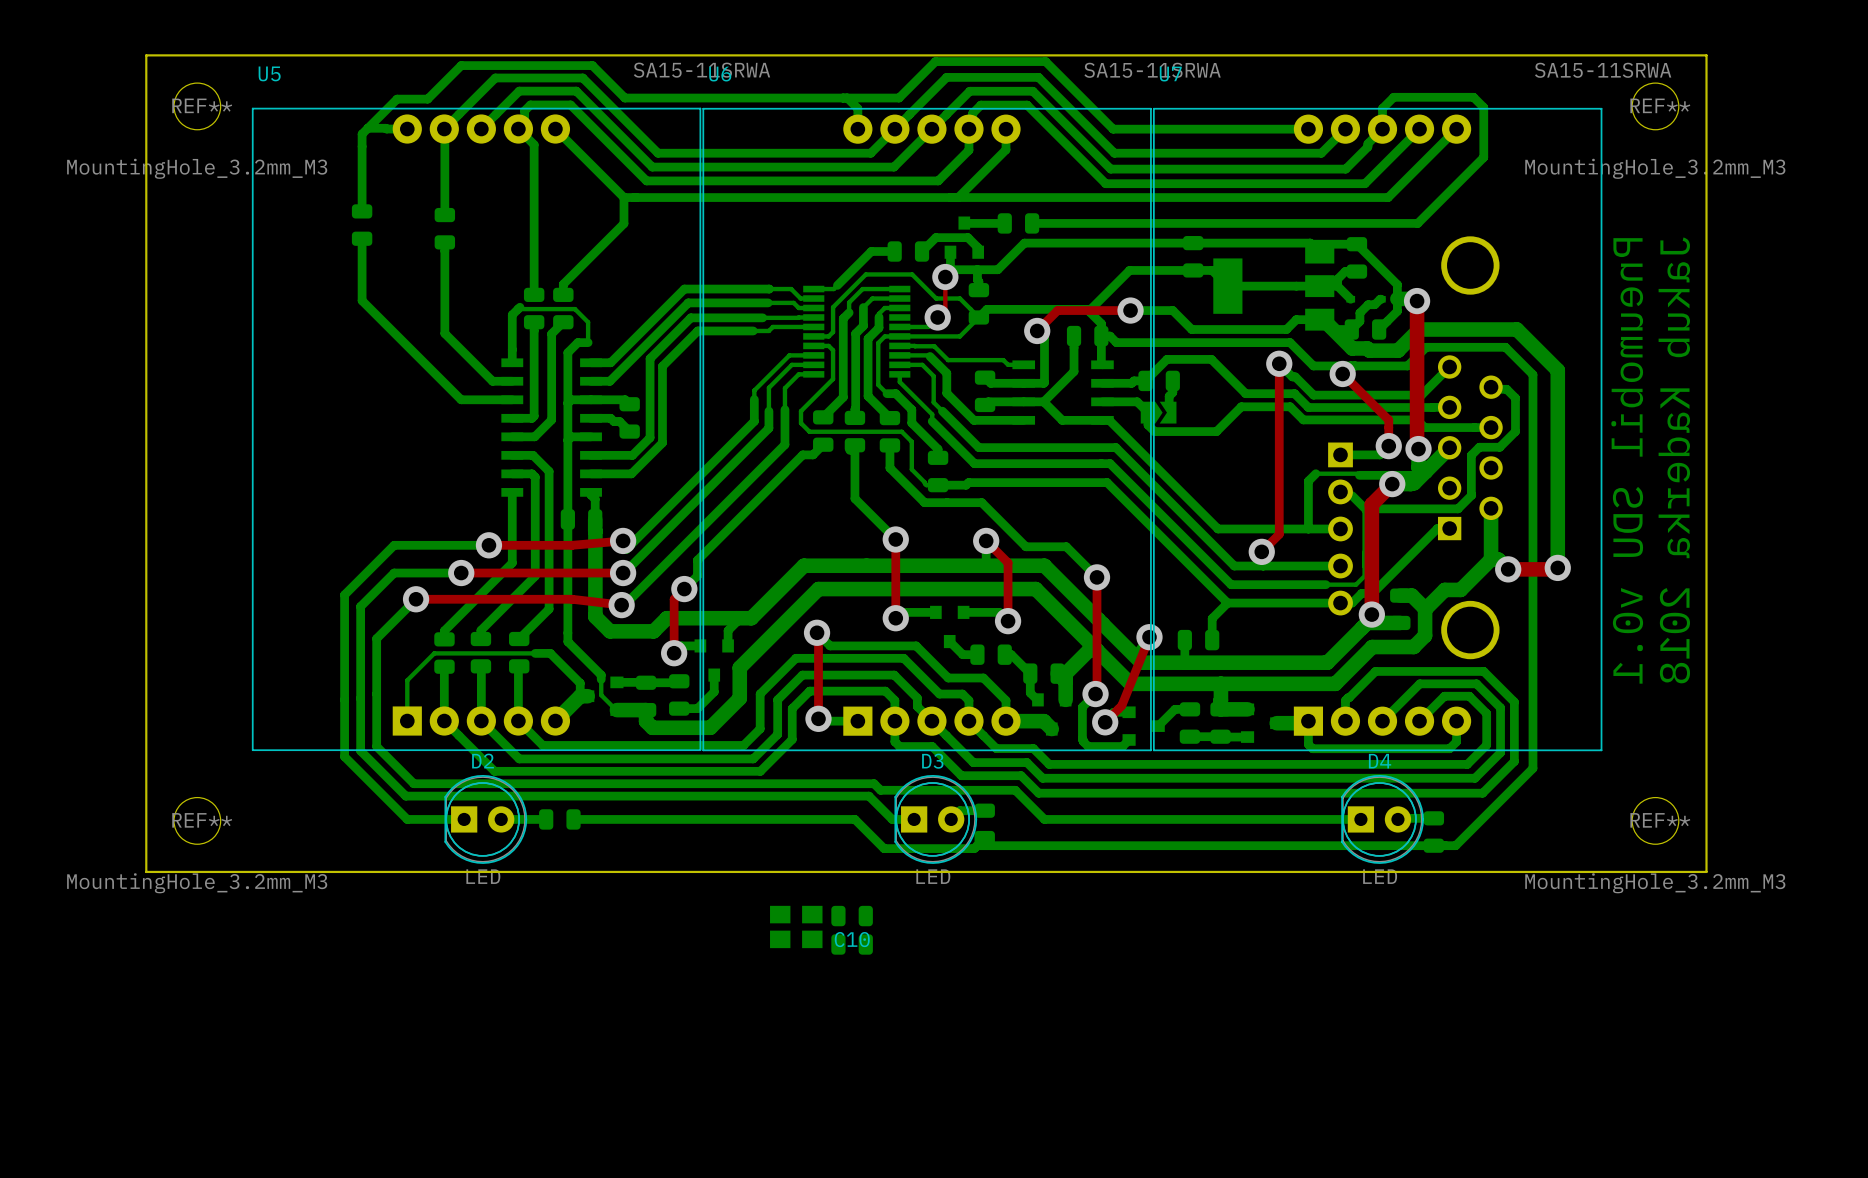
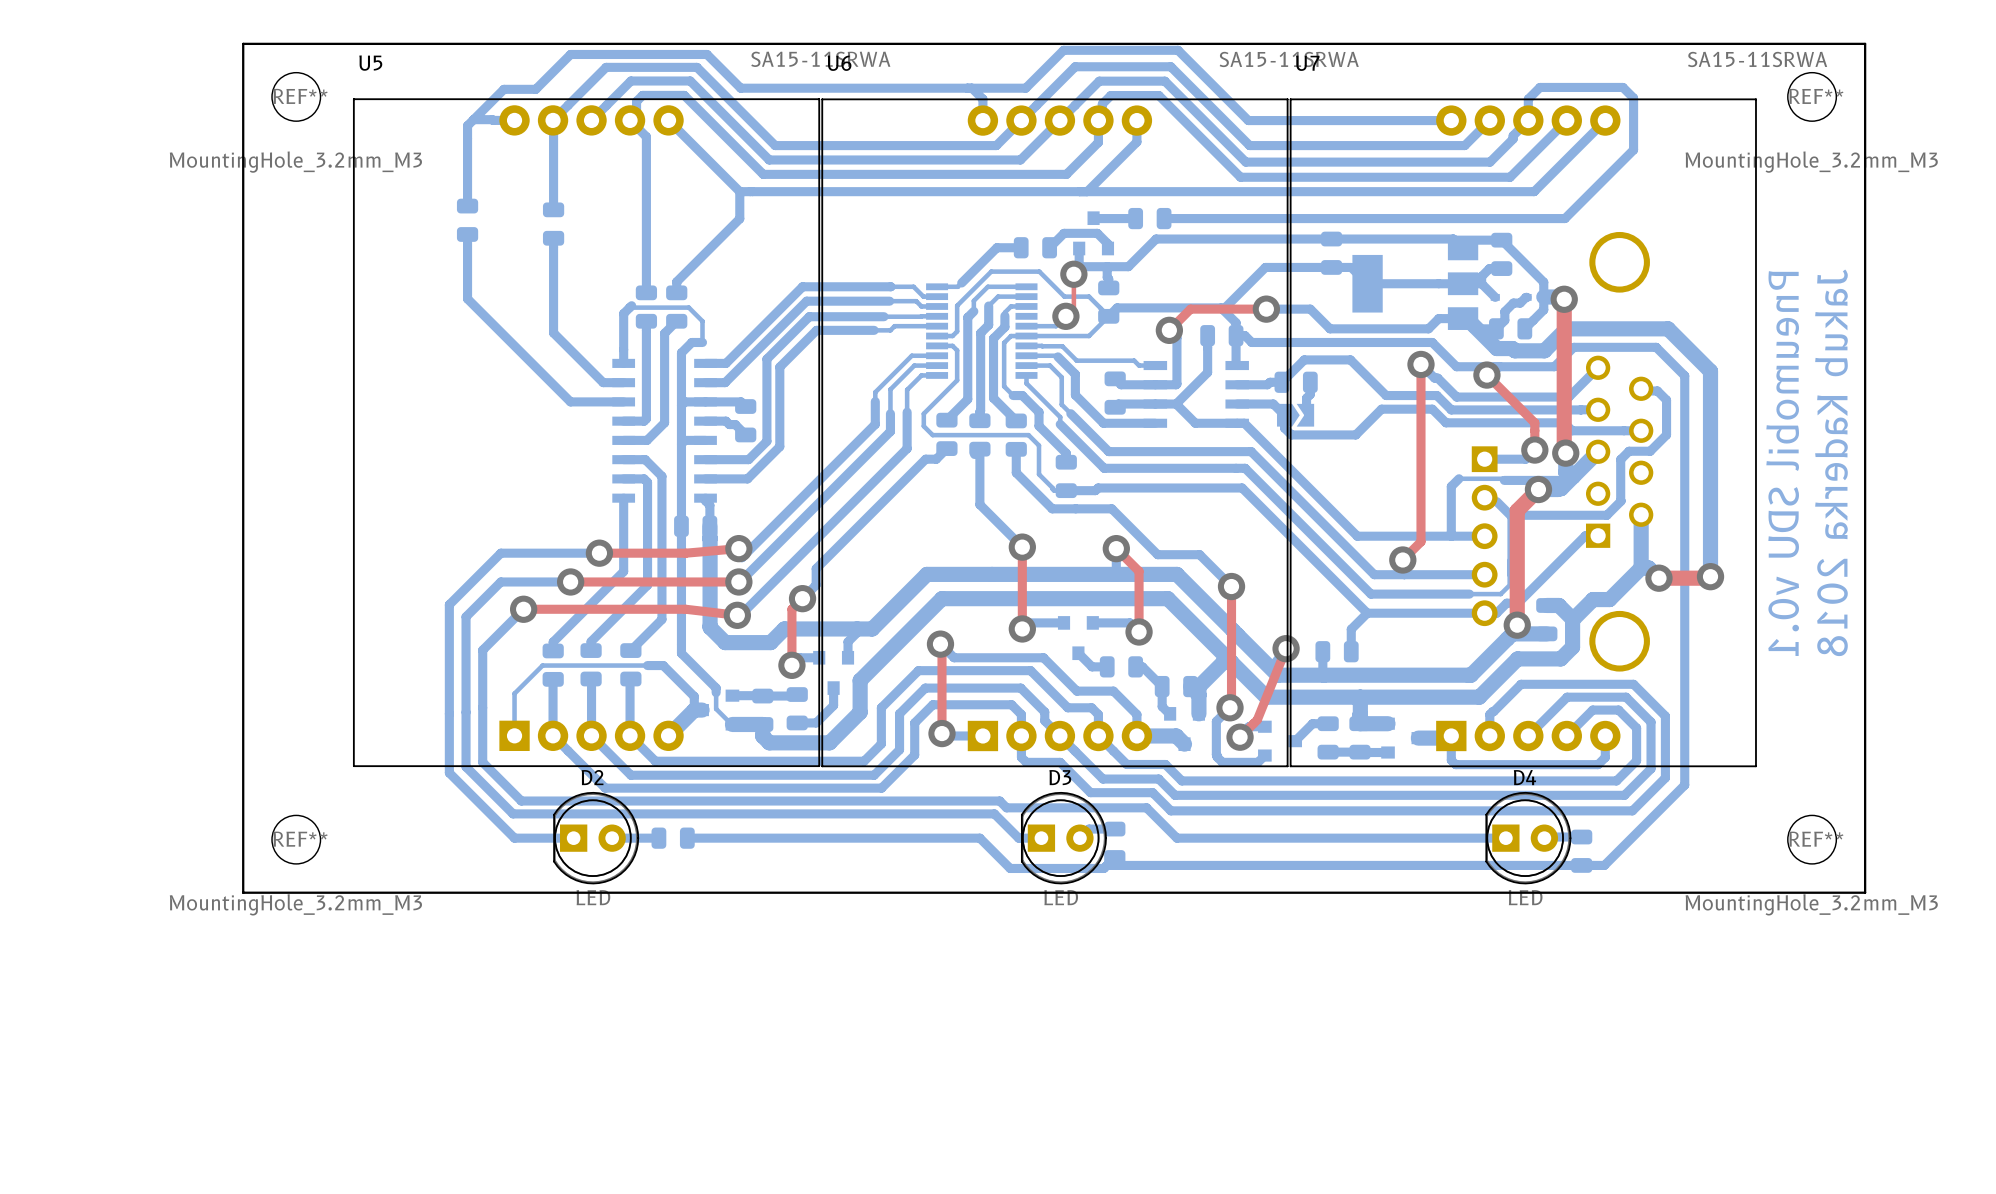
C10: (852, 916) -> none
part: (796, 926) -> none
part: (852, 944) -> none

